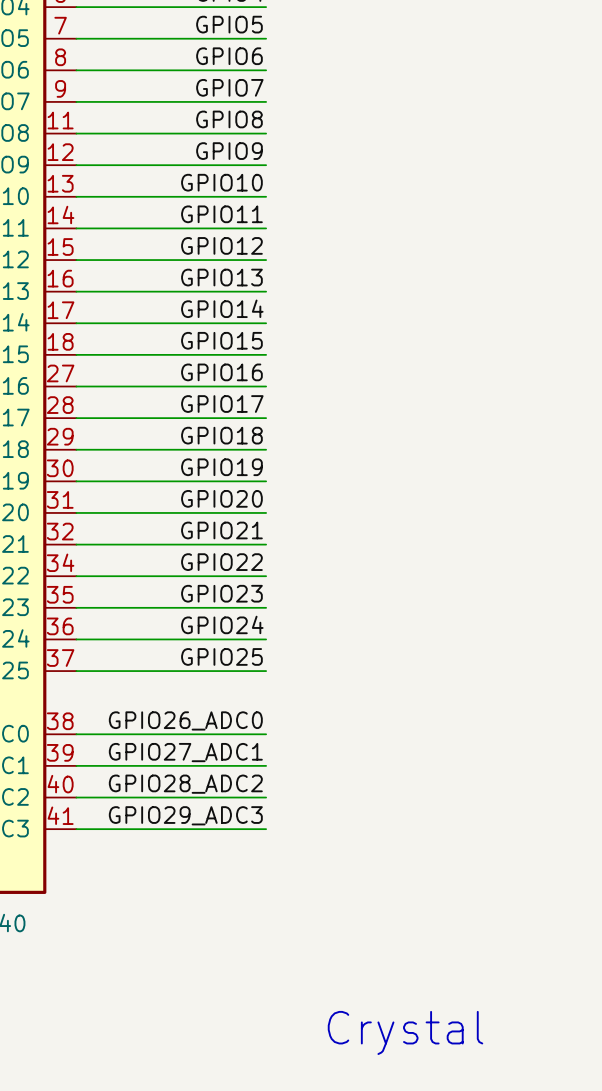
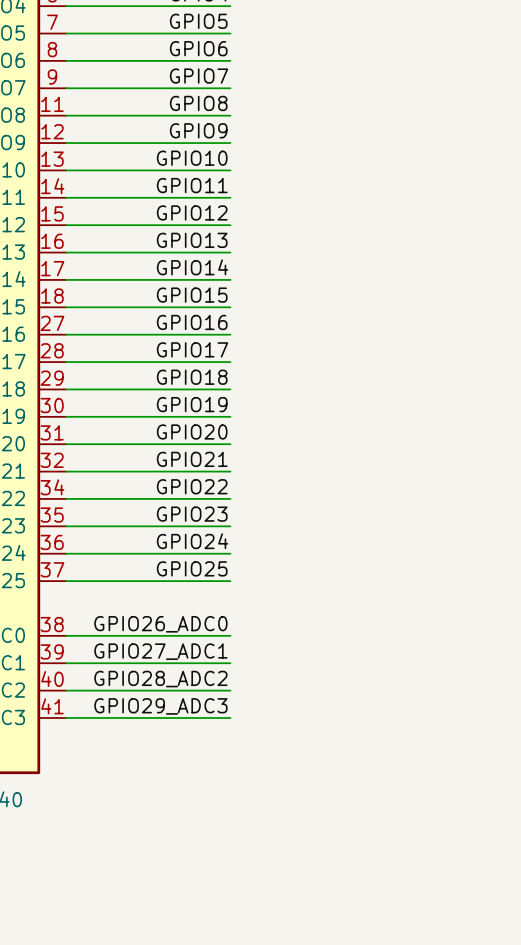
text: Crystal (405, 1032) -> none

